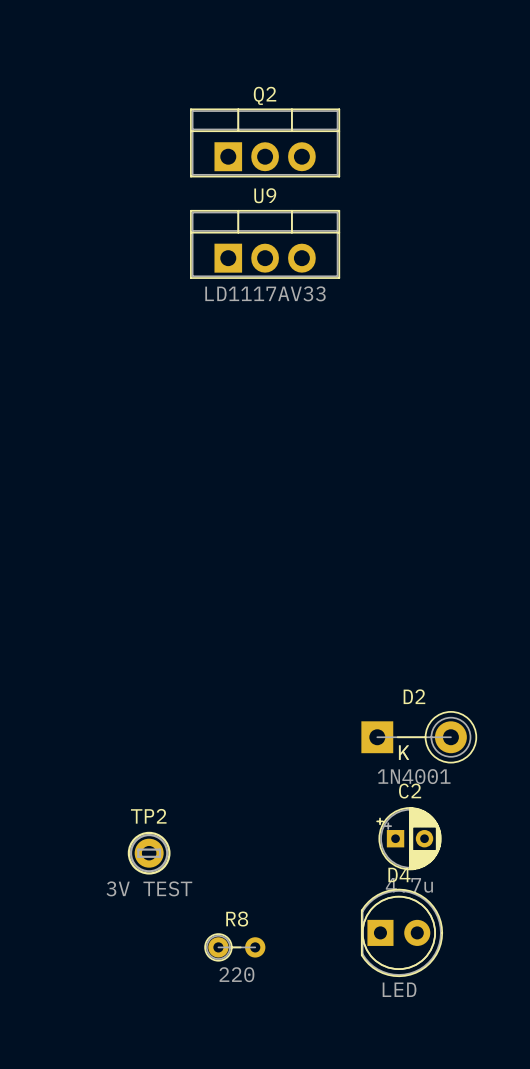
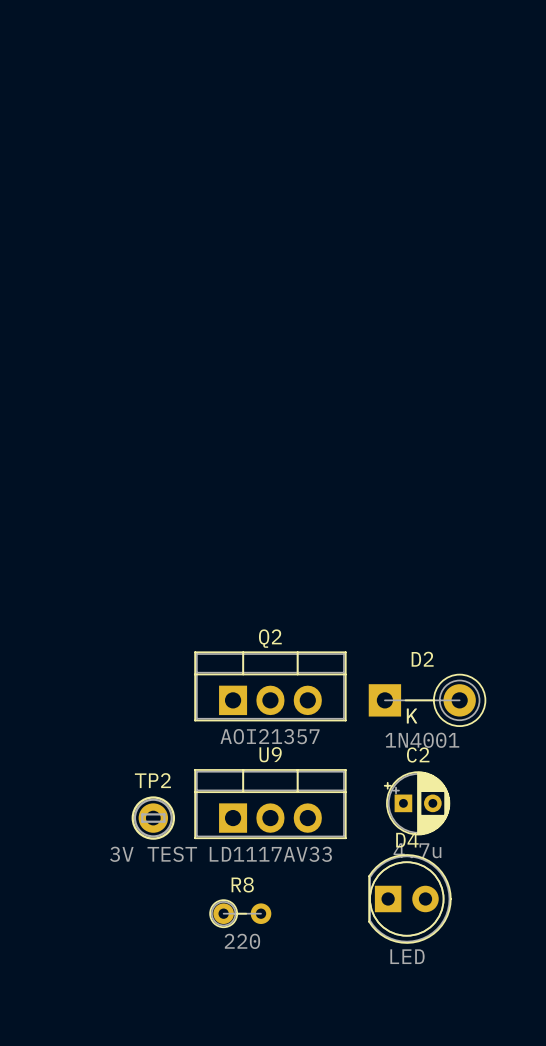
Q2 position: (265, 142) -> (270, 686)
U9 position: (265, 244) -> (270, 804)
Q2 value: none -> AOI21357 (270, 736)

